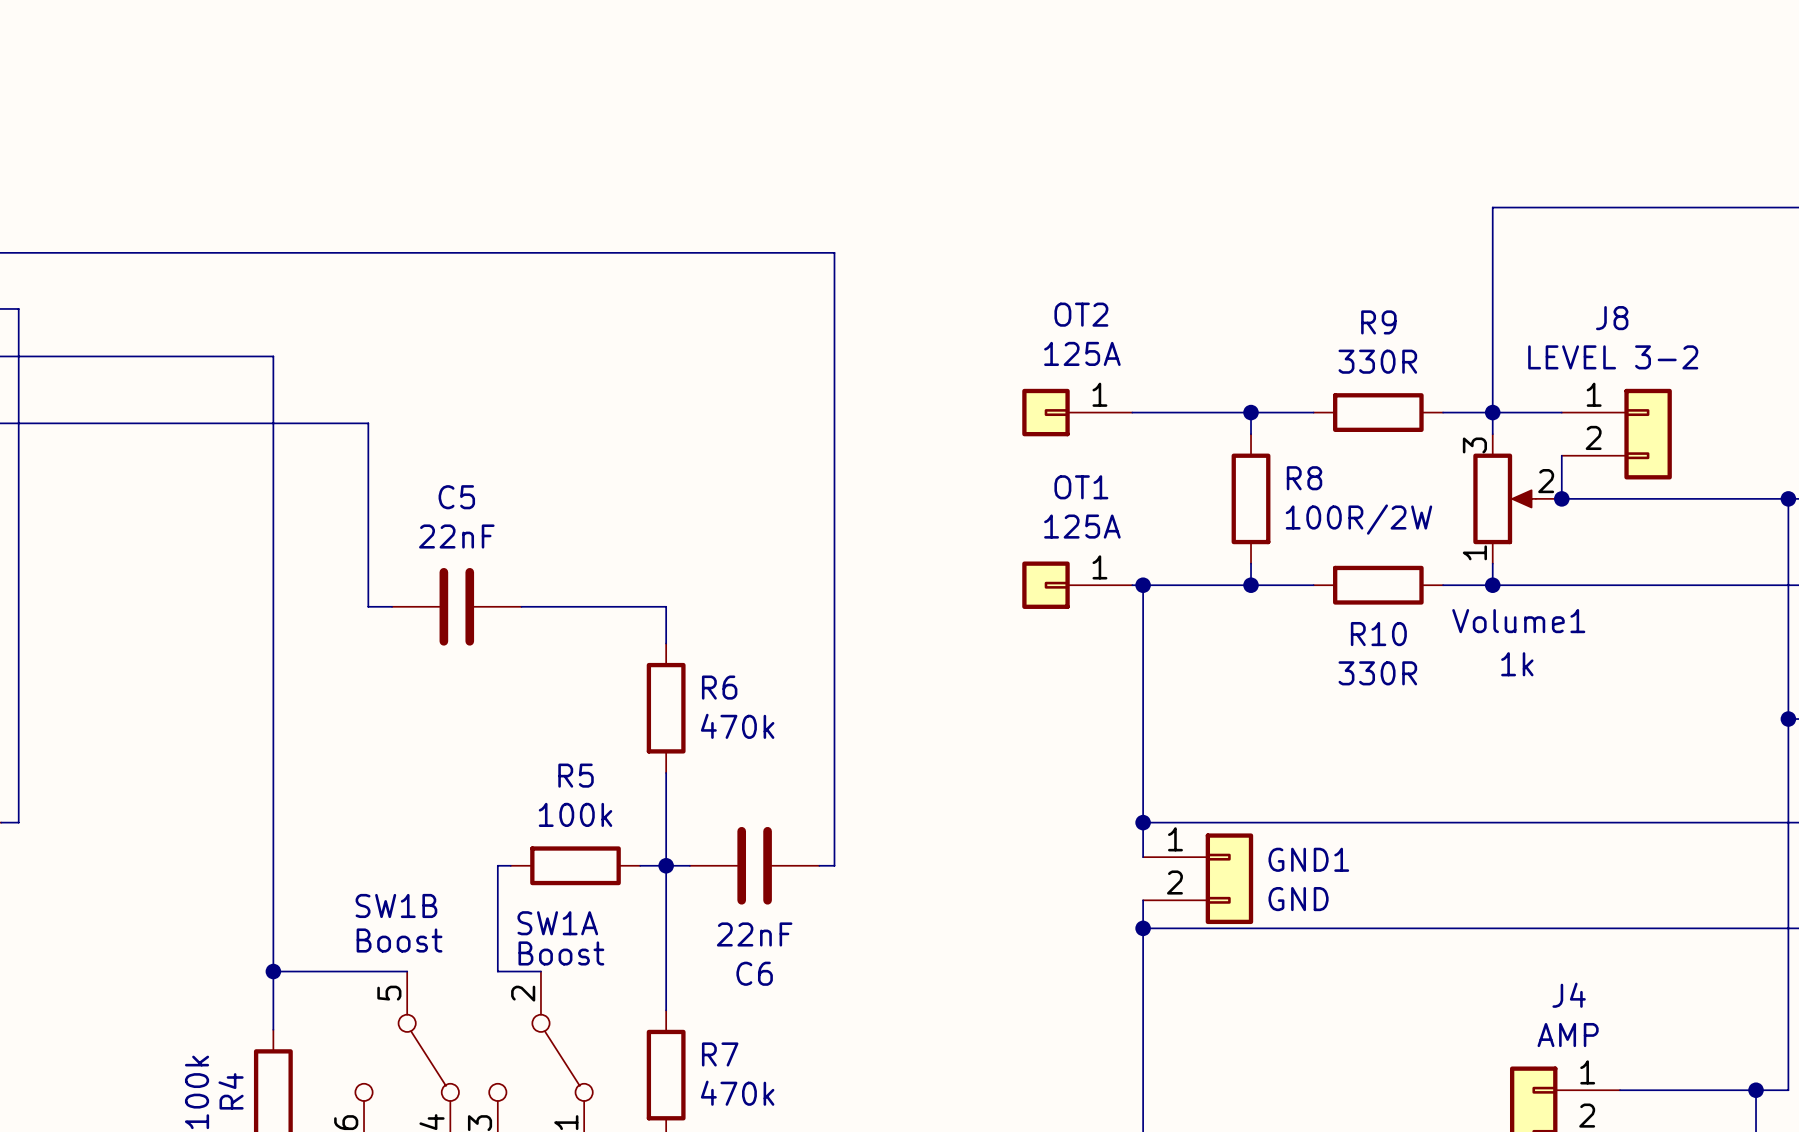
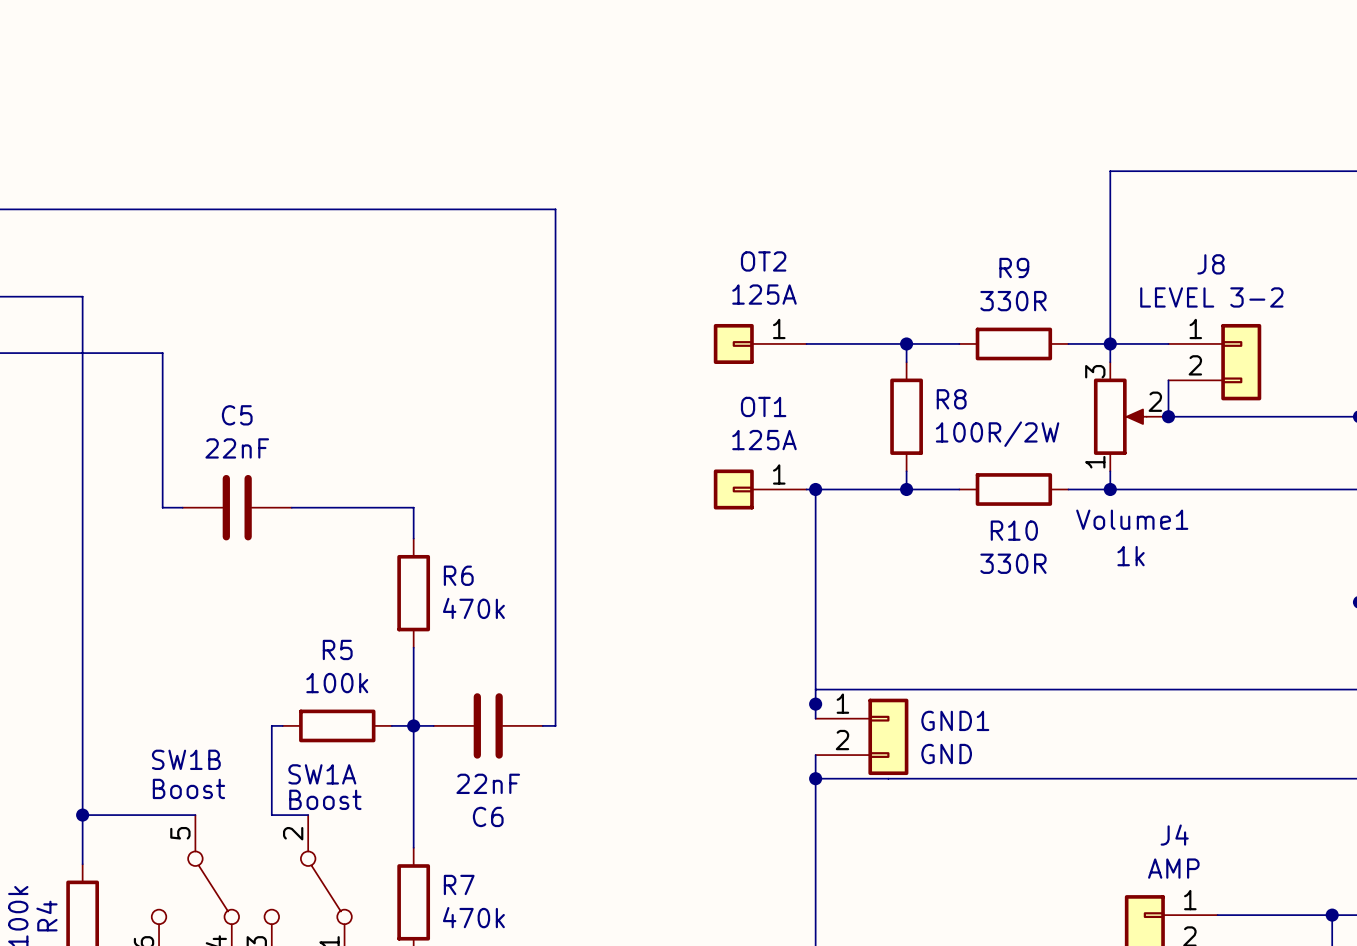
junction position: (1143, 822) -> (815, 704)

